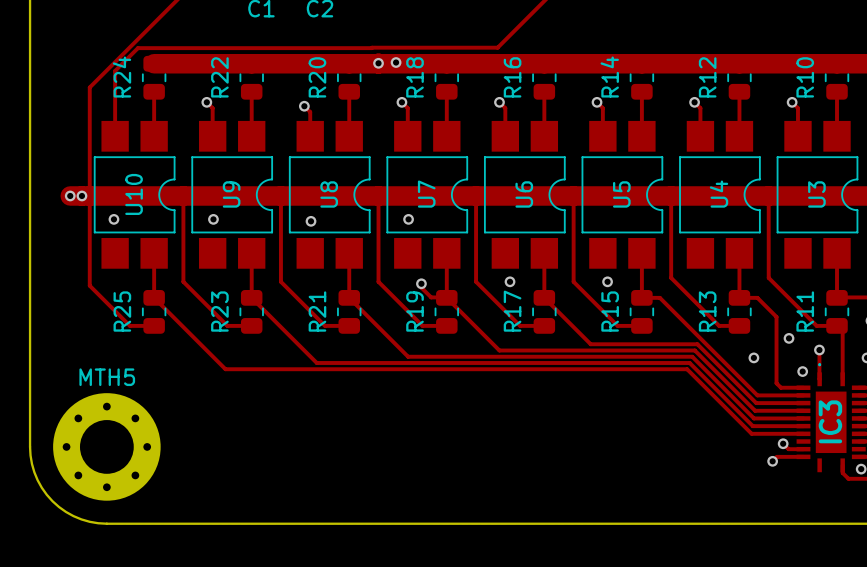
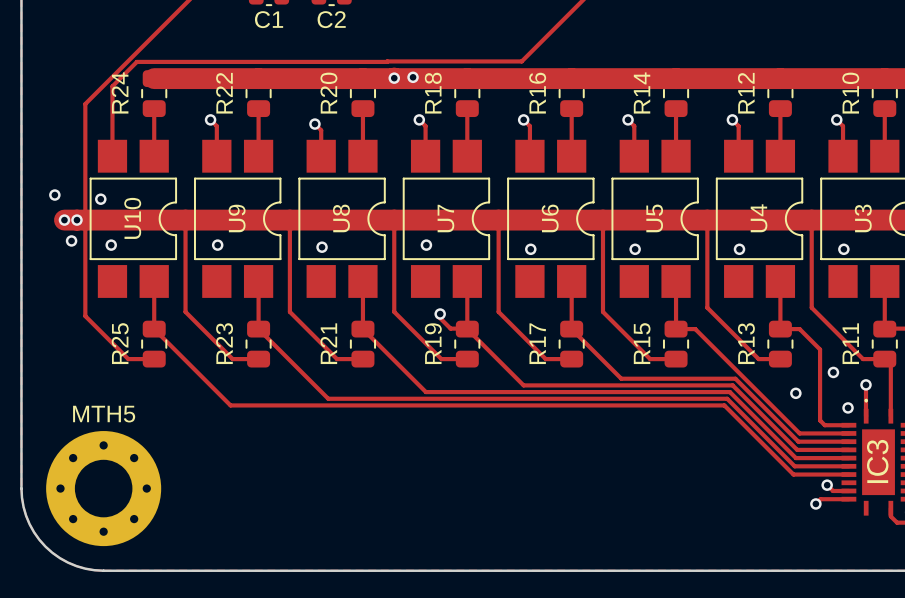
via: none -> (54, 195)
via: none -> (100, 199)
via: none -> (71, 240)
via: none -> (530, 249)
via: none -> (635, 249)
via: none -> (739, 249)
via: none -> (843, 249)
via: (510, 281) -> none
via: (607, 281) -> none

